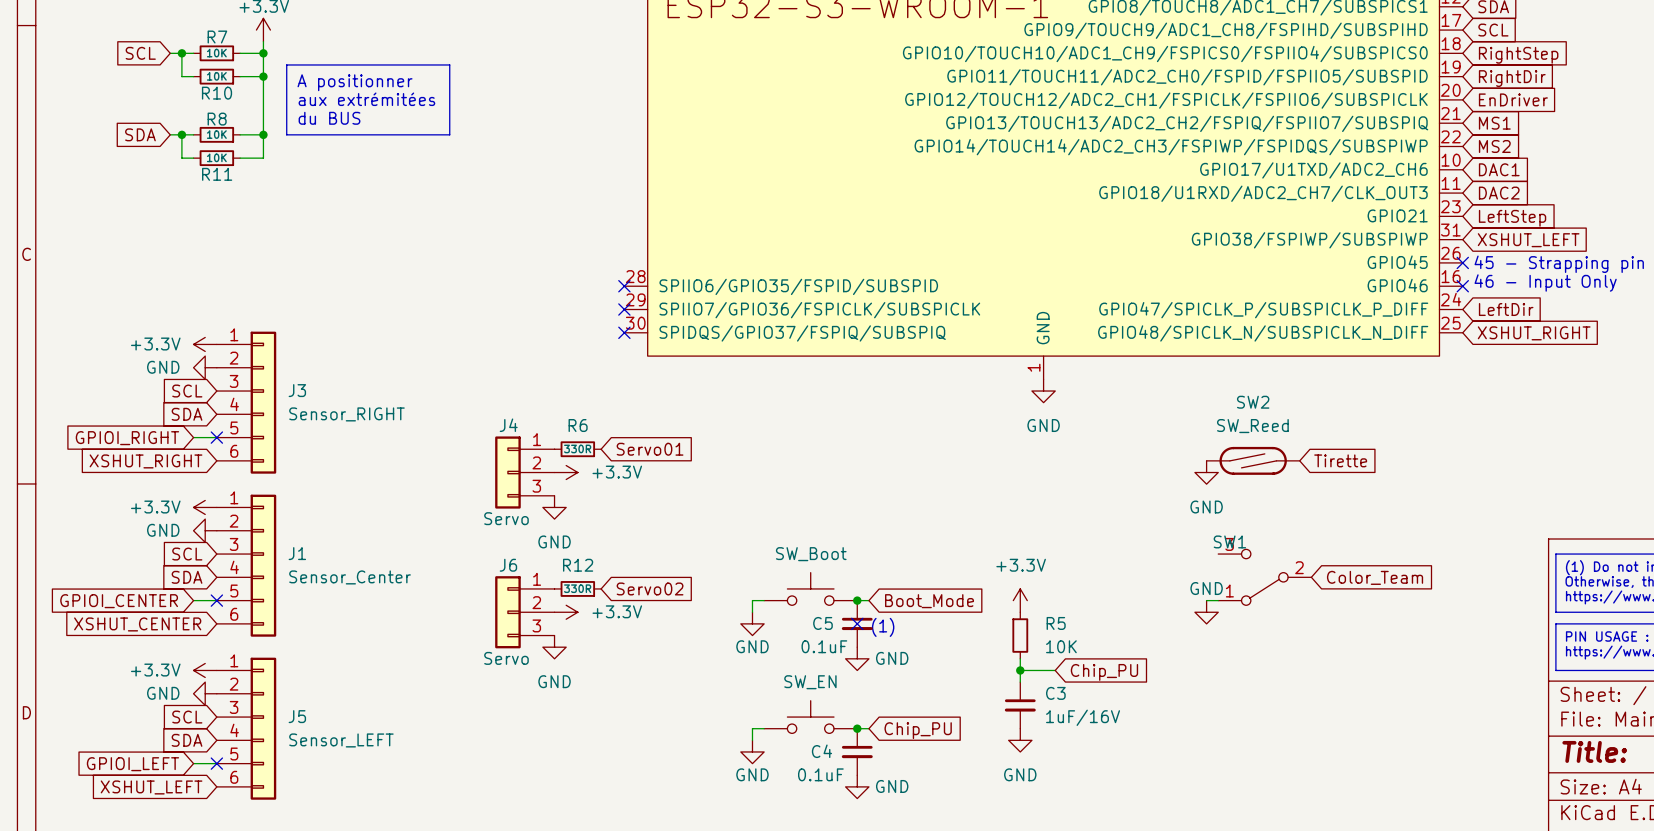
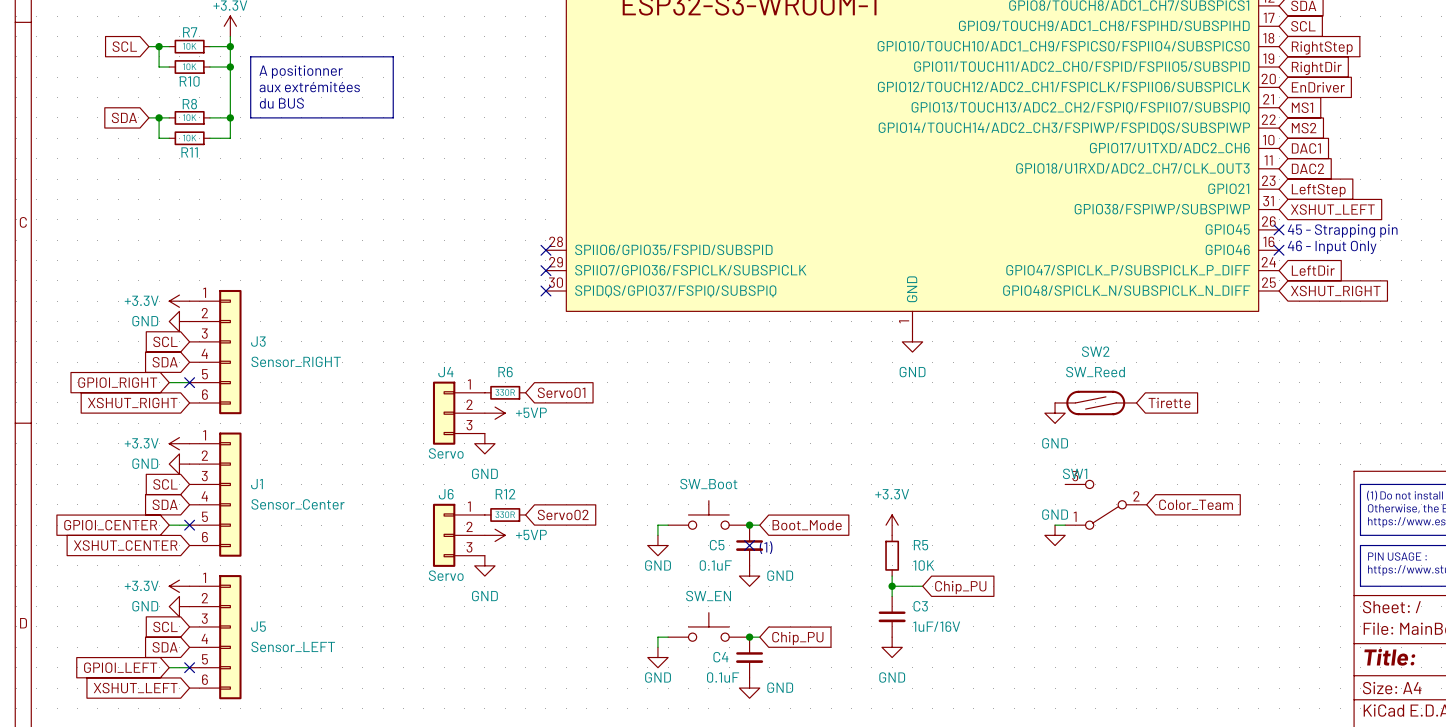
power symbol: +3.3V (566, 472) -> +5VP (495, 413)
power symbol: +3.3V (566, 612) -> +5VP (495, 535)

